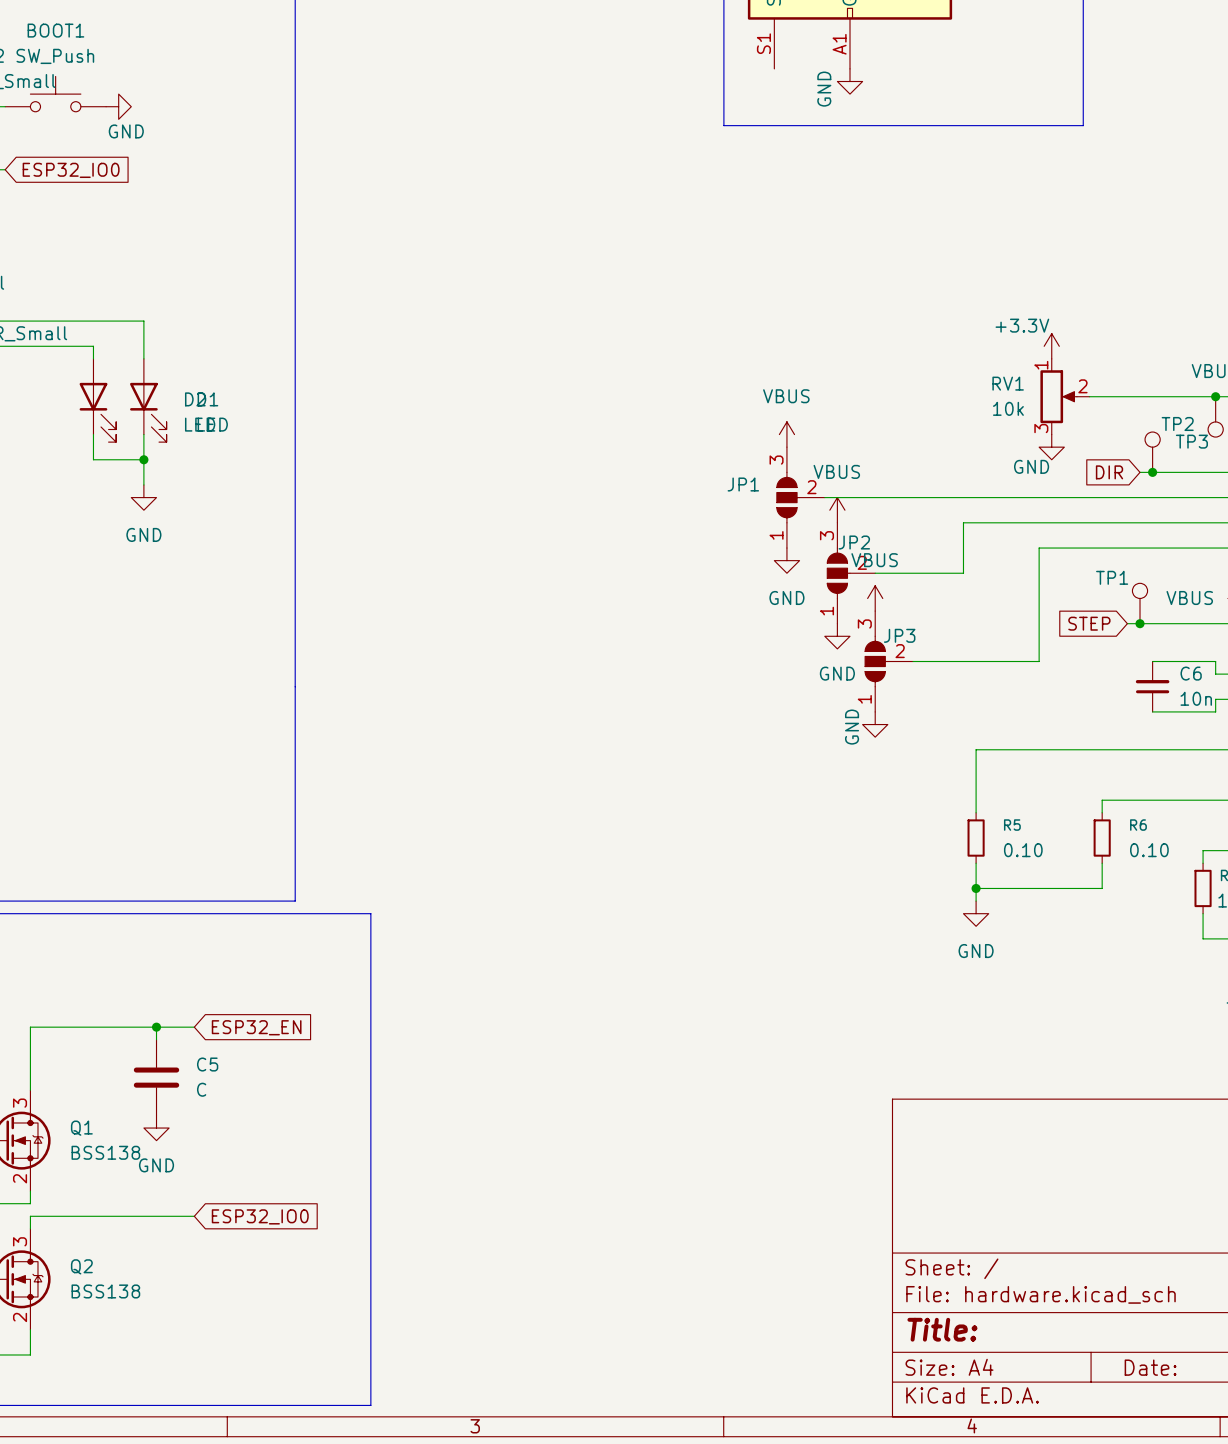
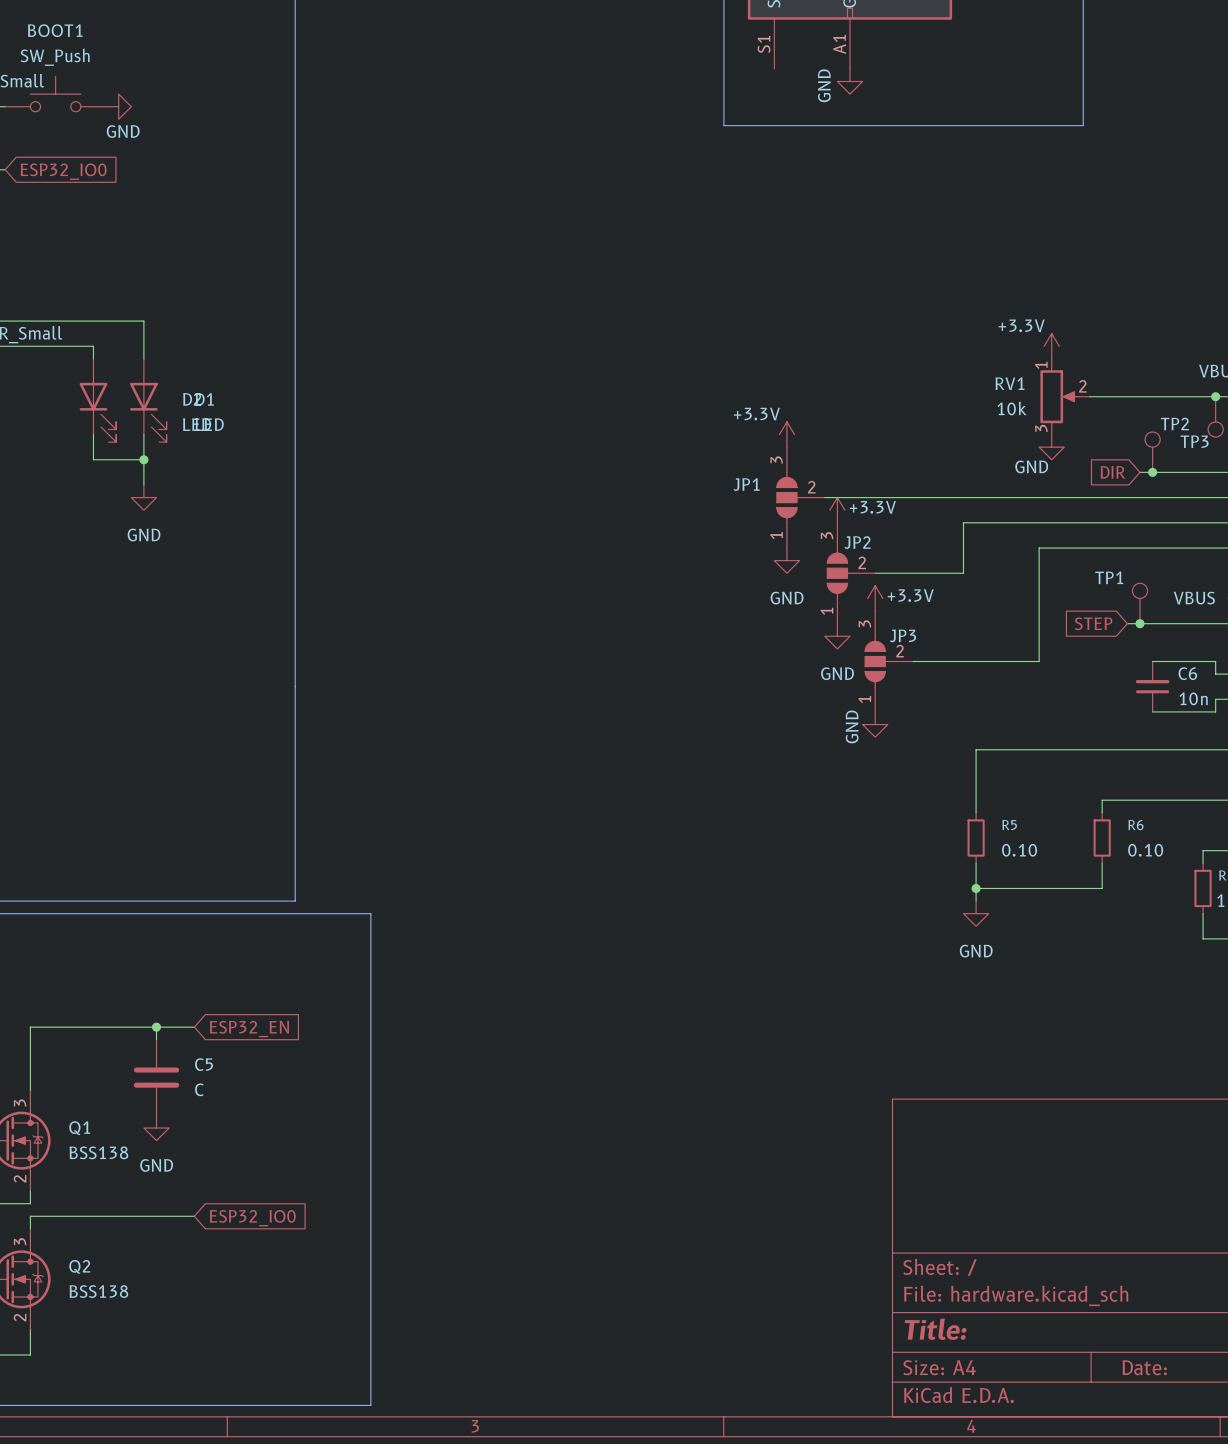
power symbol: VBUS (786, 434) -> +3.3V (786, 434)
power symbol: VBUS (837, 510) -> +3.3V (837, 510)
power symbol: VBUS (875, 598) -> +3.3V (875, 598)

